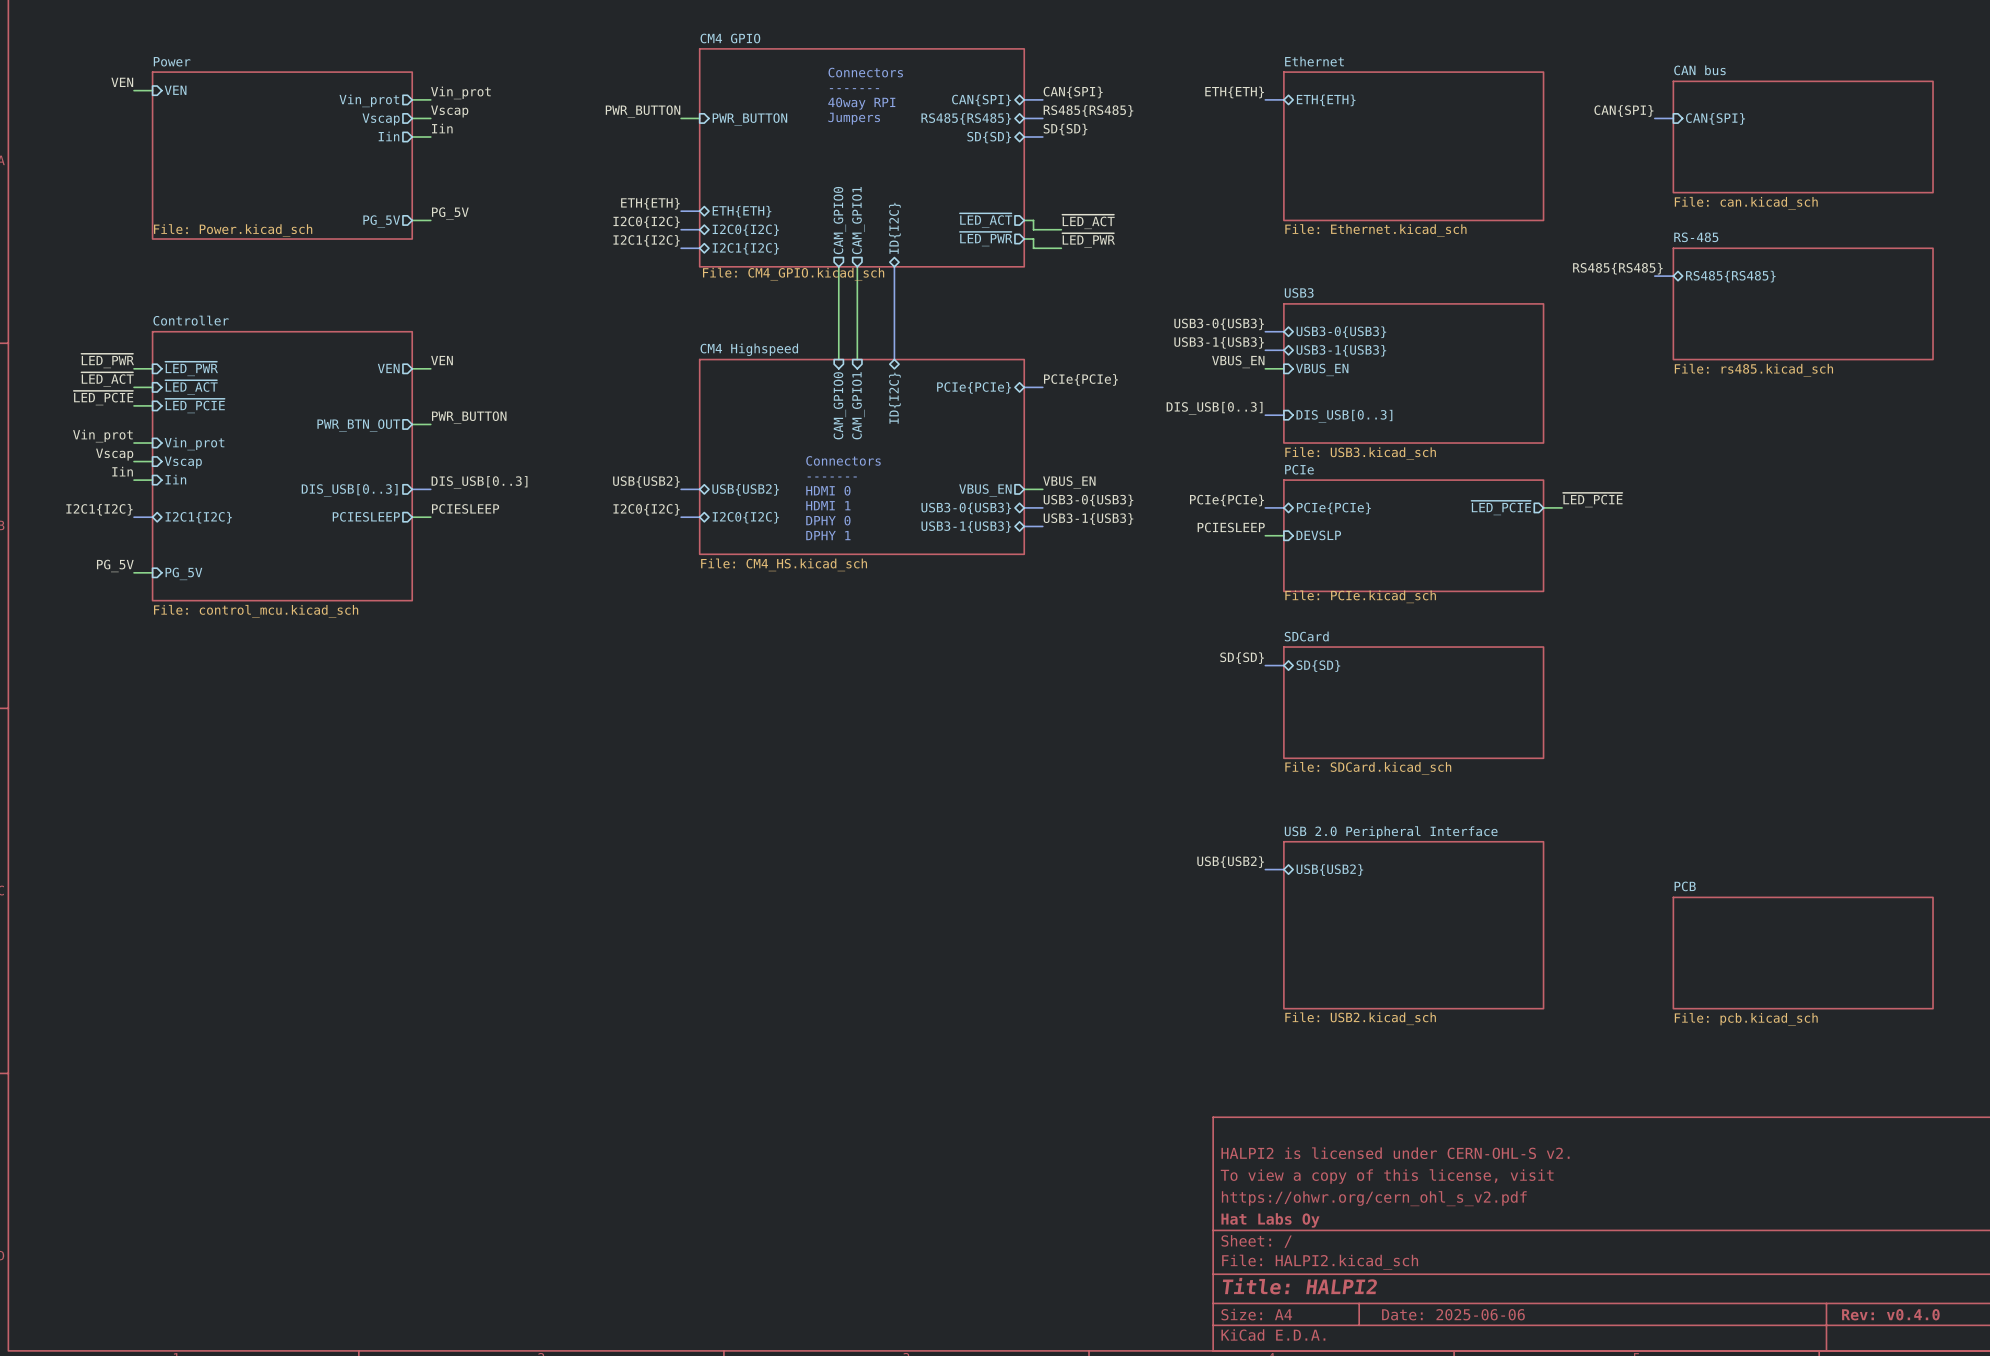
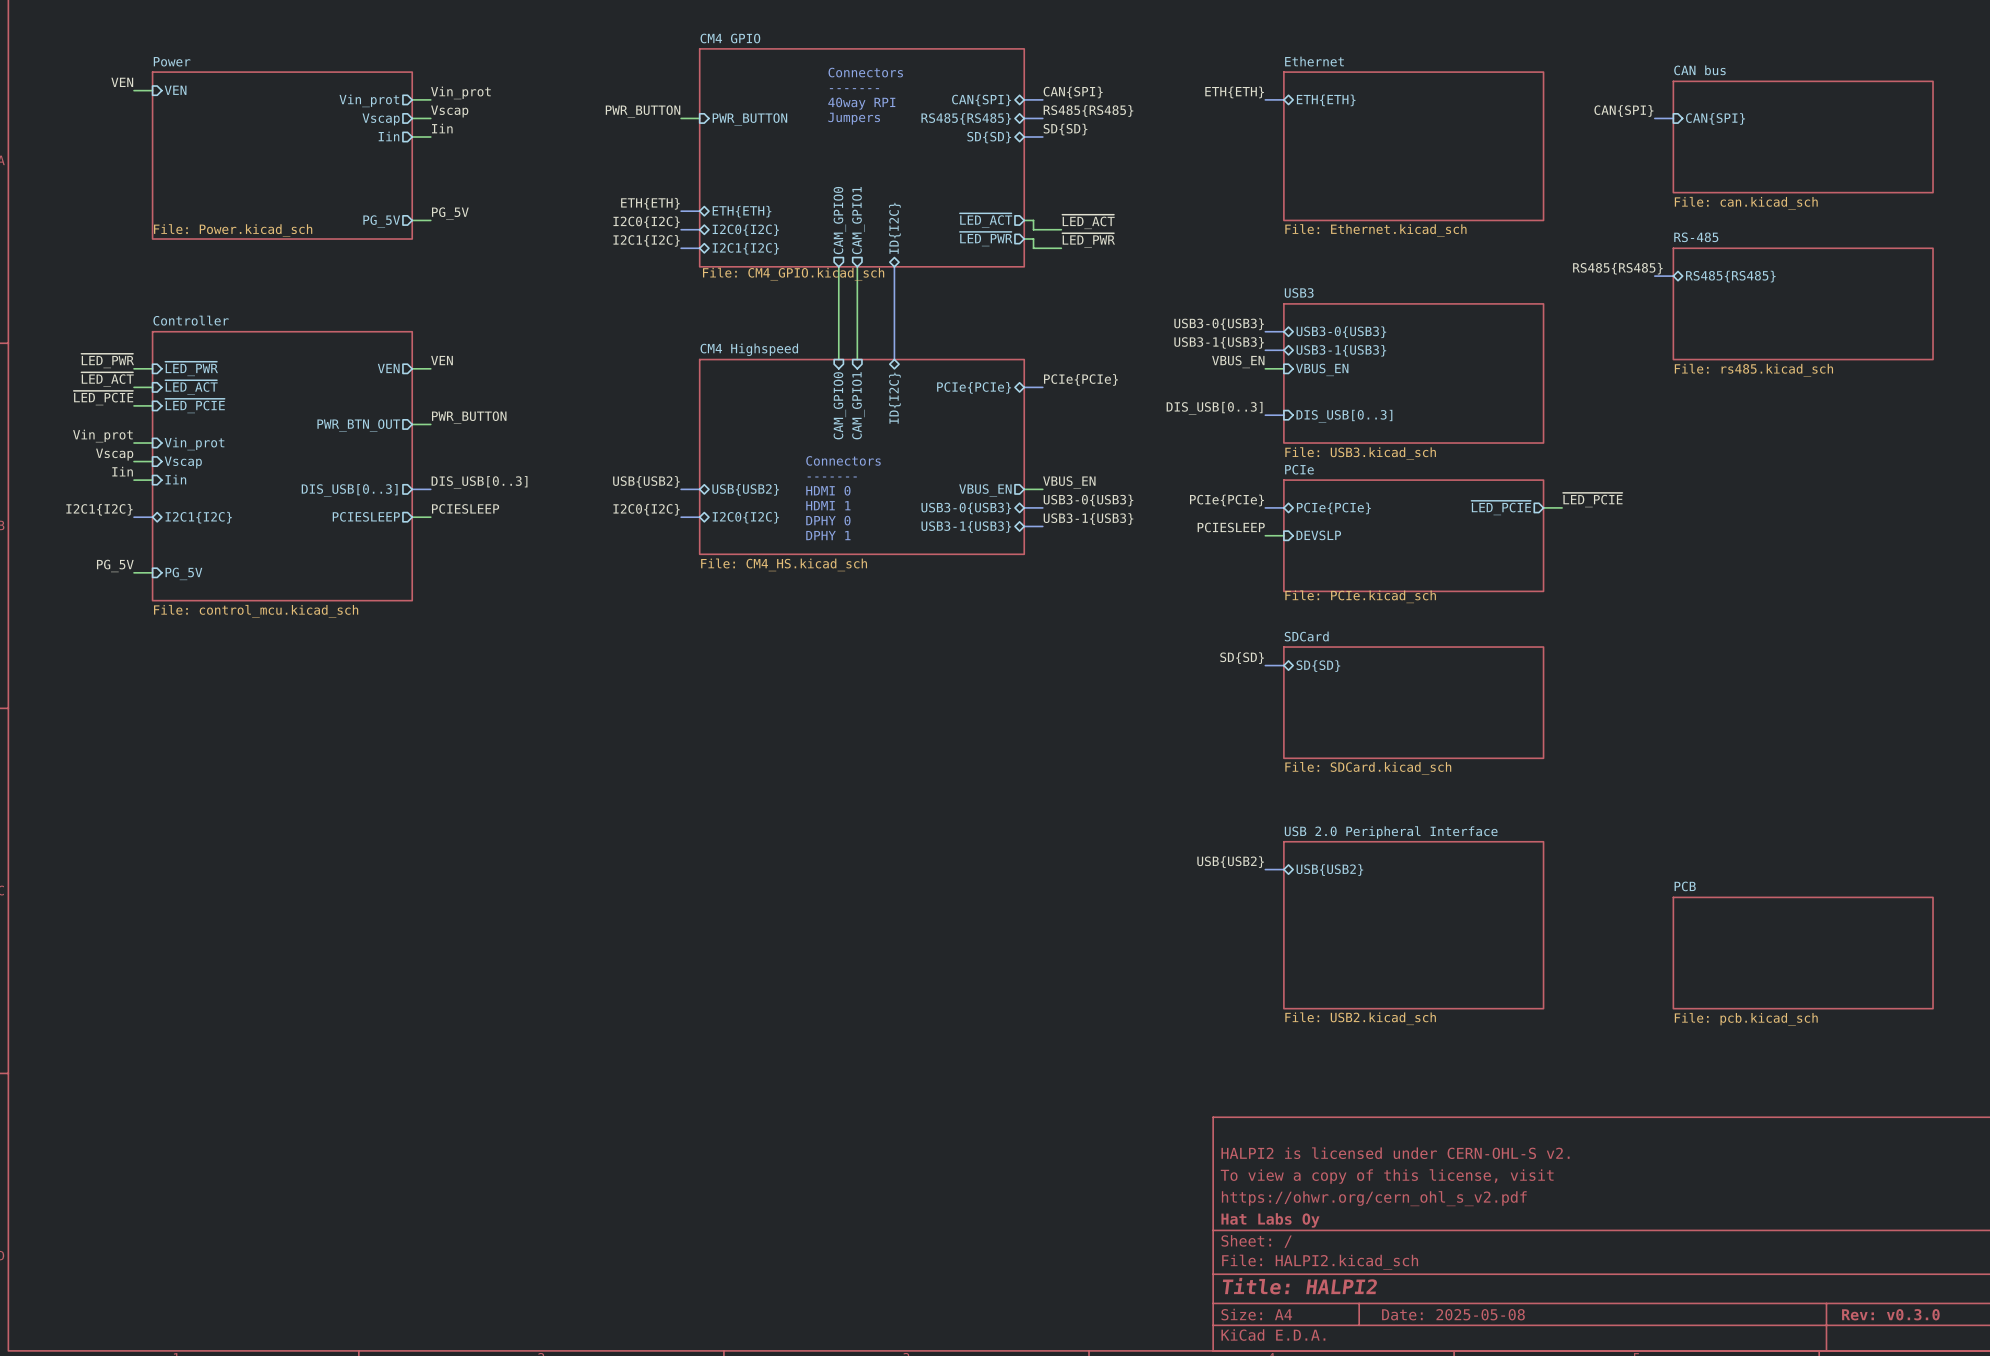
title block: Date: 2025-06-06 (1453, 1314) -> Date: 2025-05-08 (1453, 1314)
title block: Rev: v0.4.0 (1890, 1314) -> Rev: v0.3.0 (1890, 1314)

